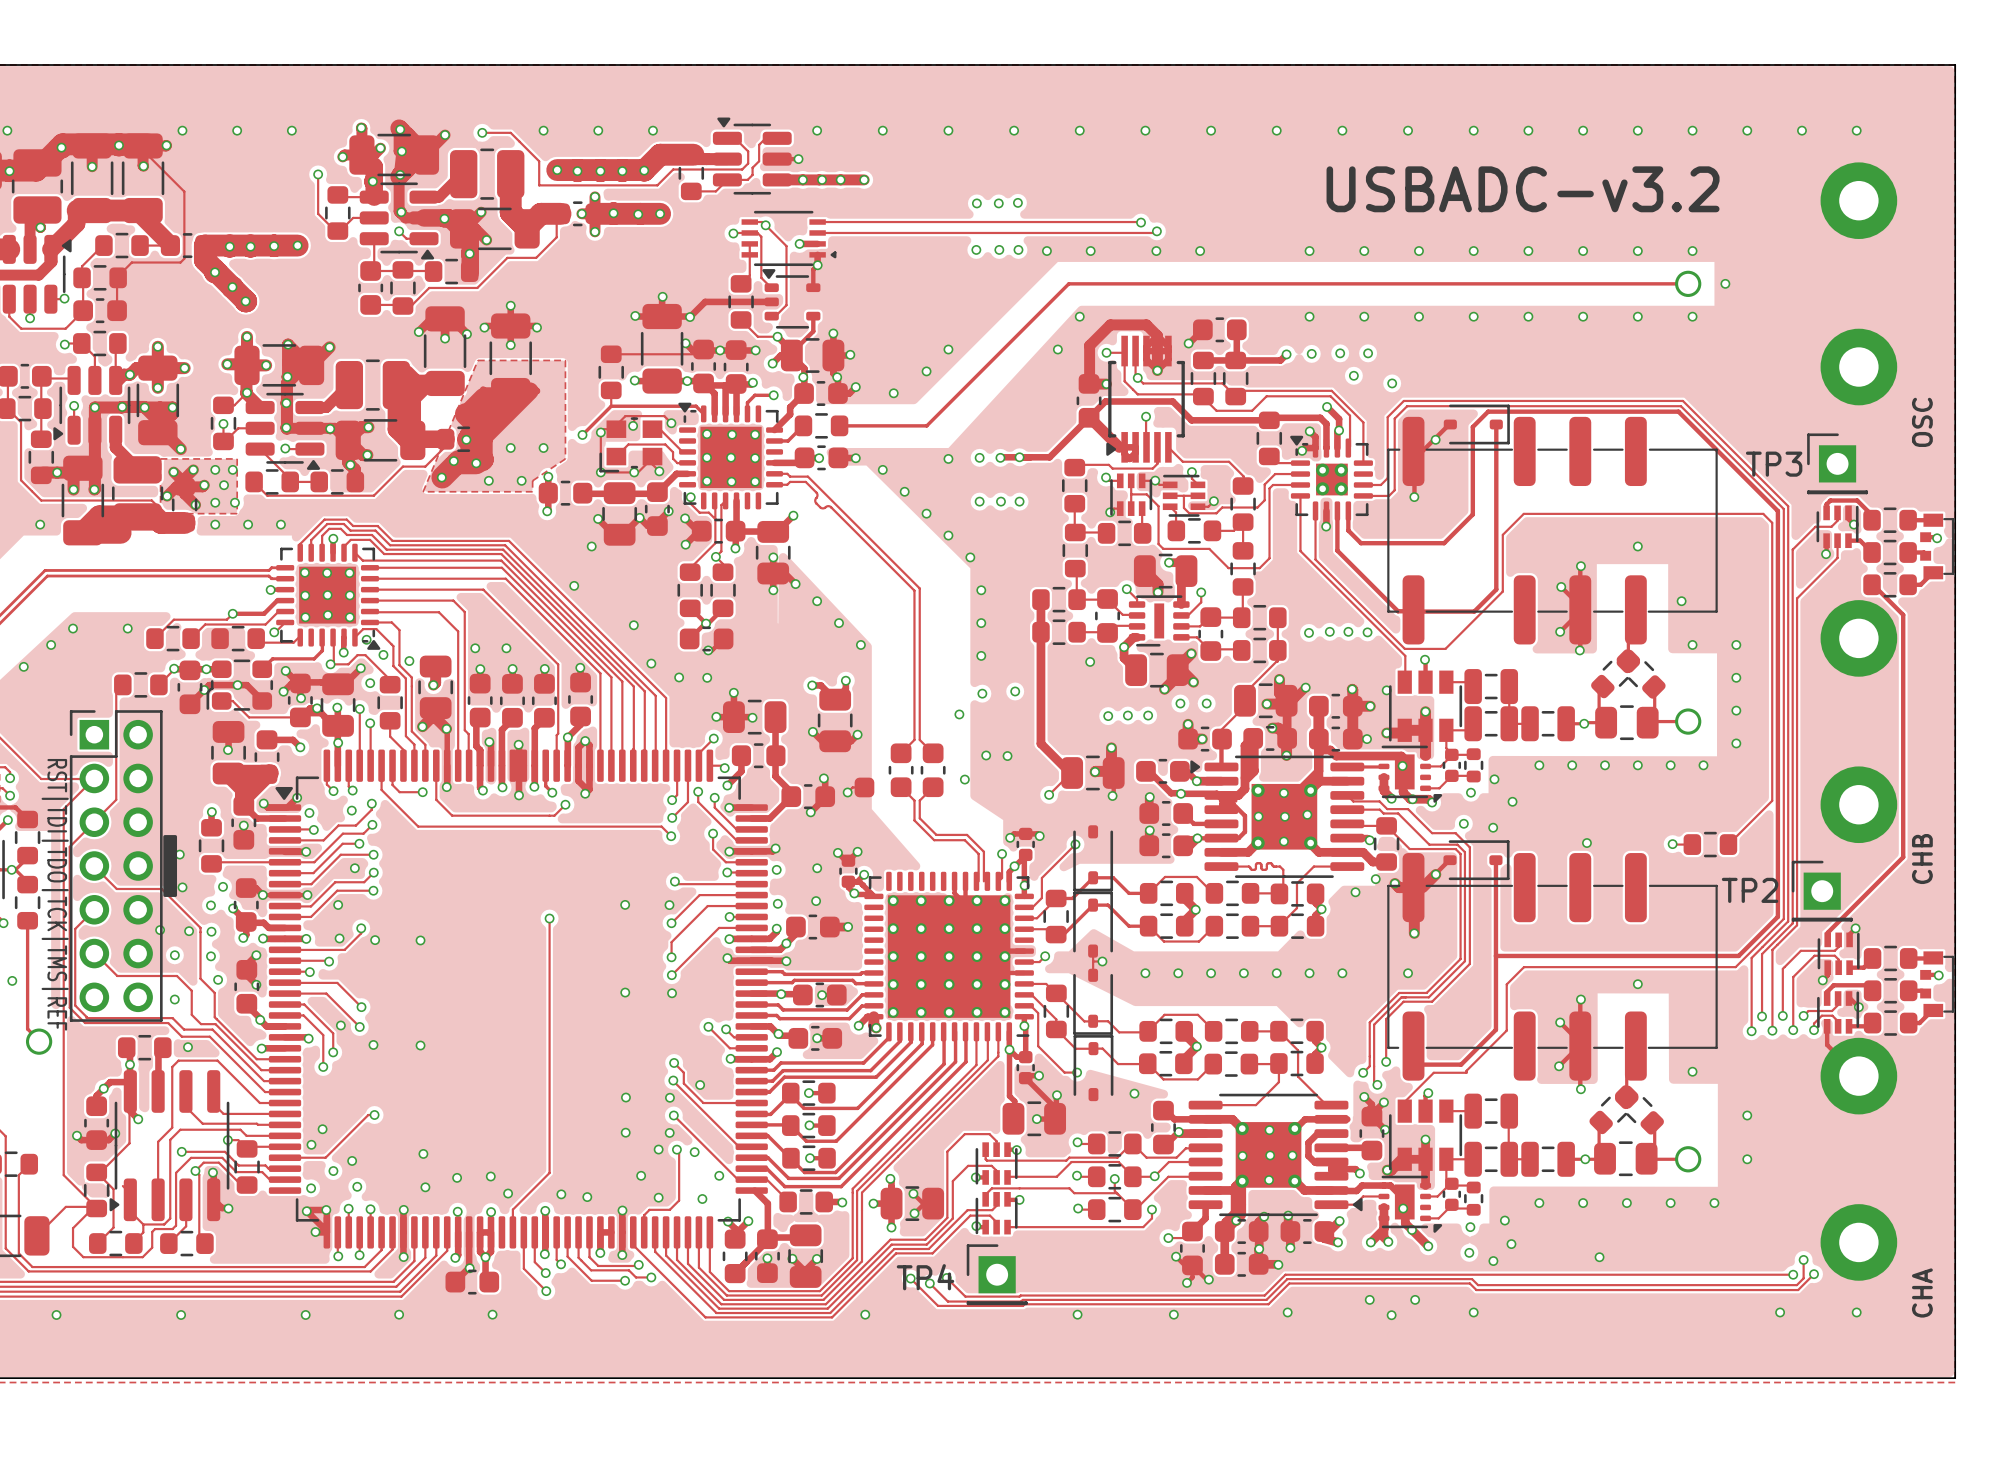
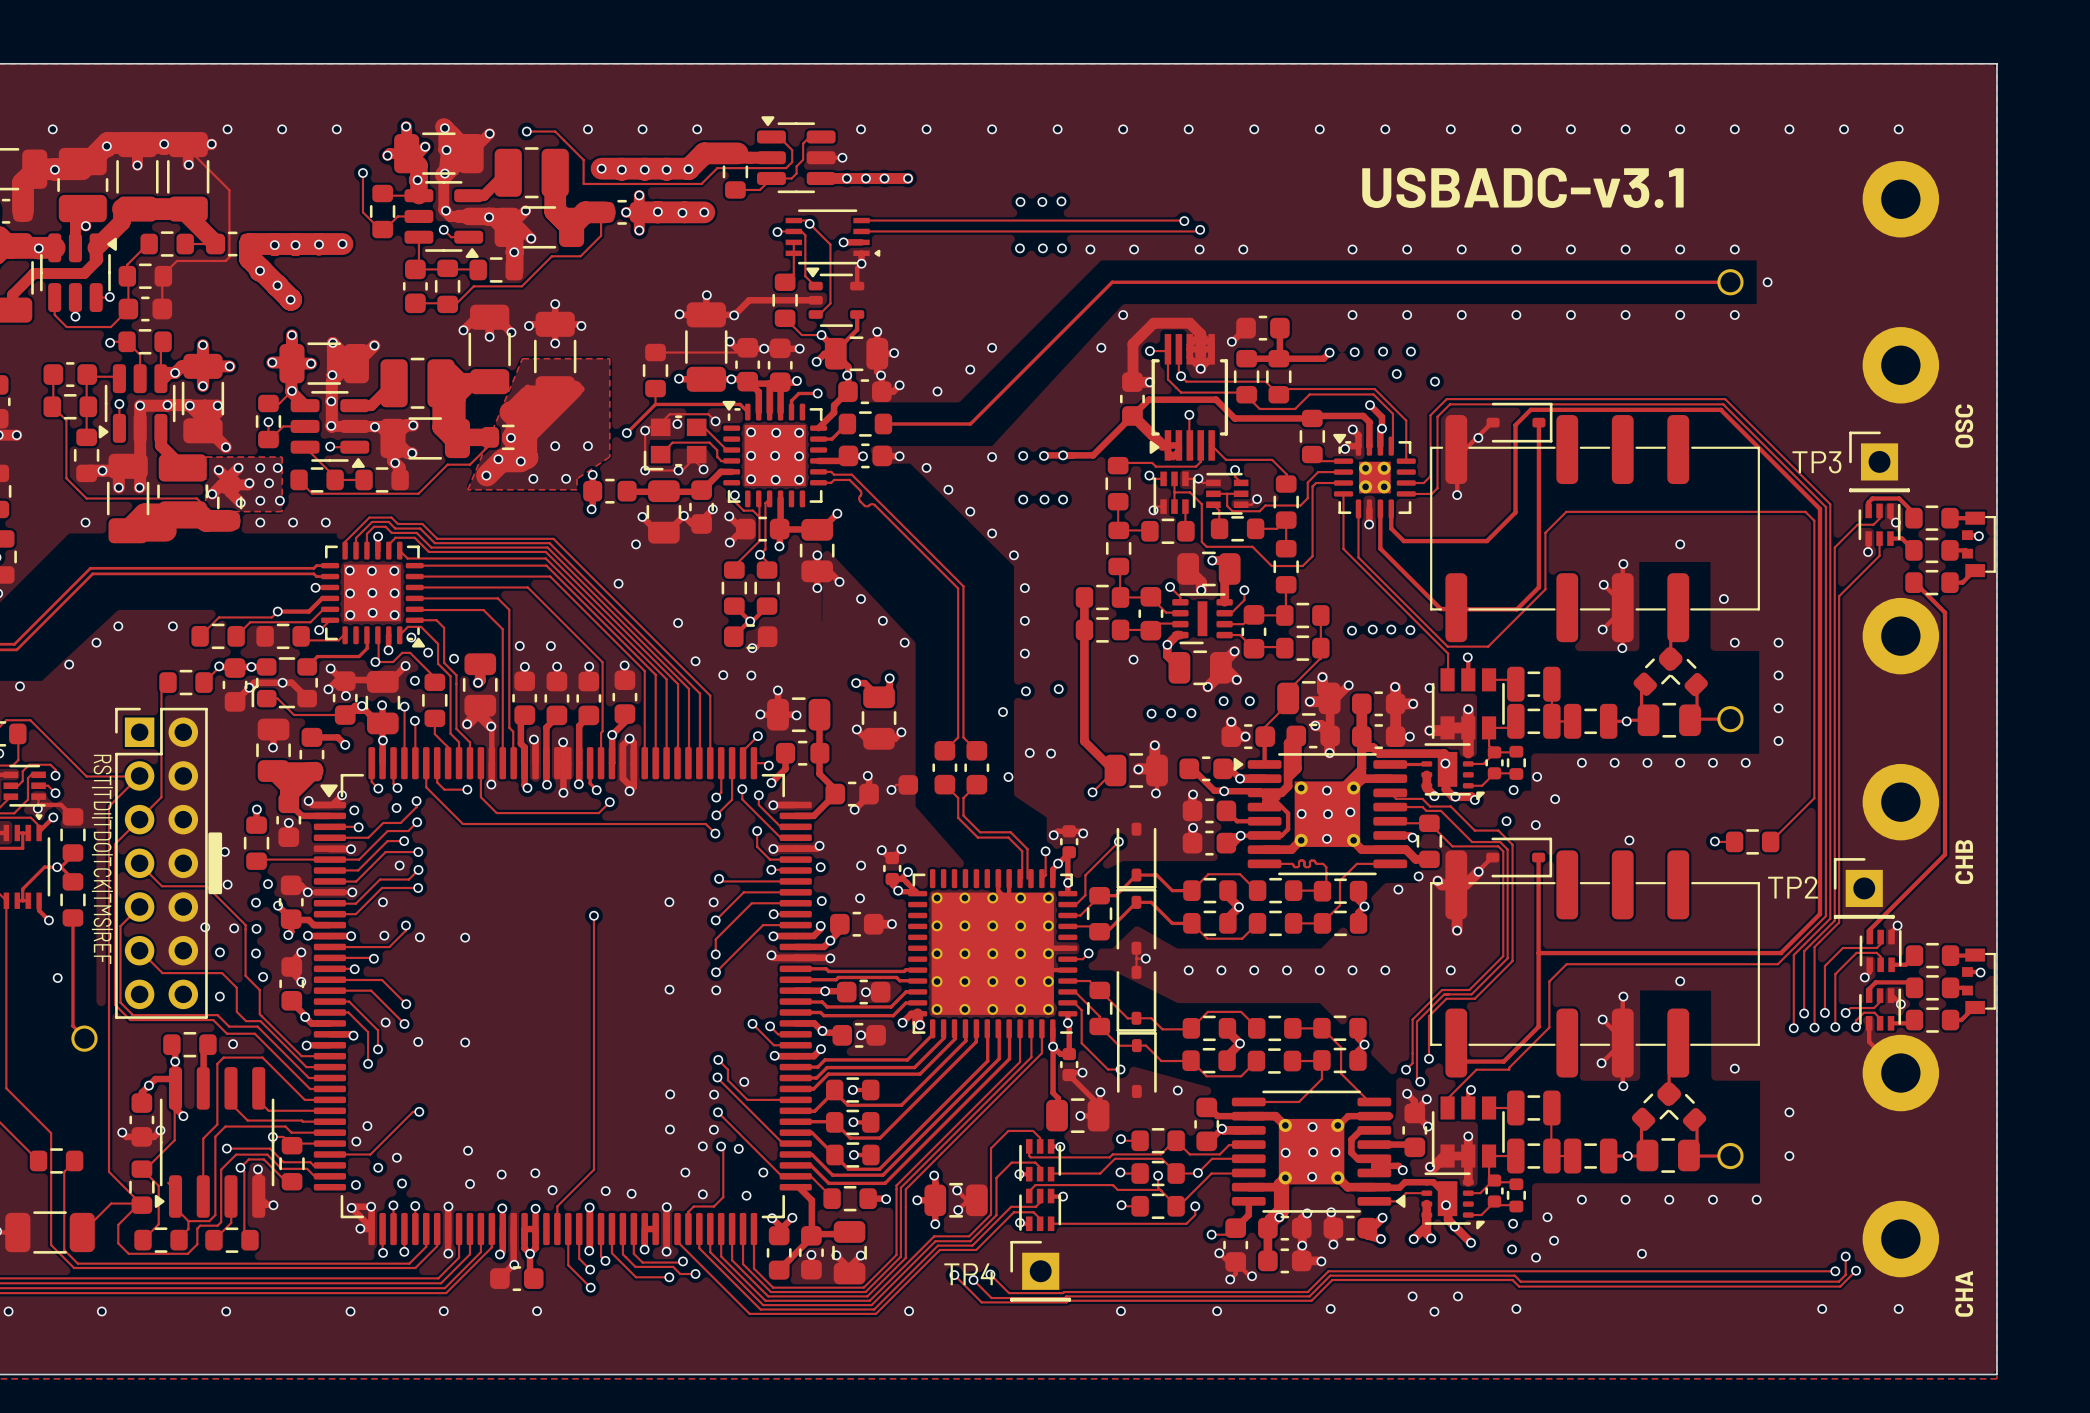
text: USBADC-v3.2 (1523, 189) -> USBADC-v3.1 (1522, 187)

